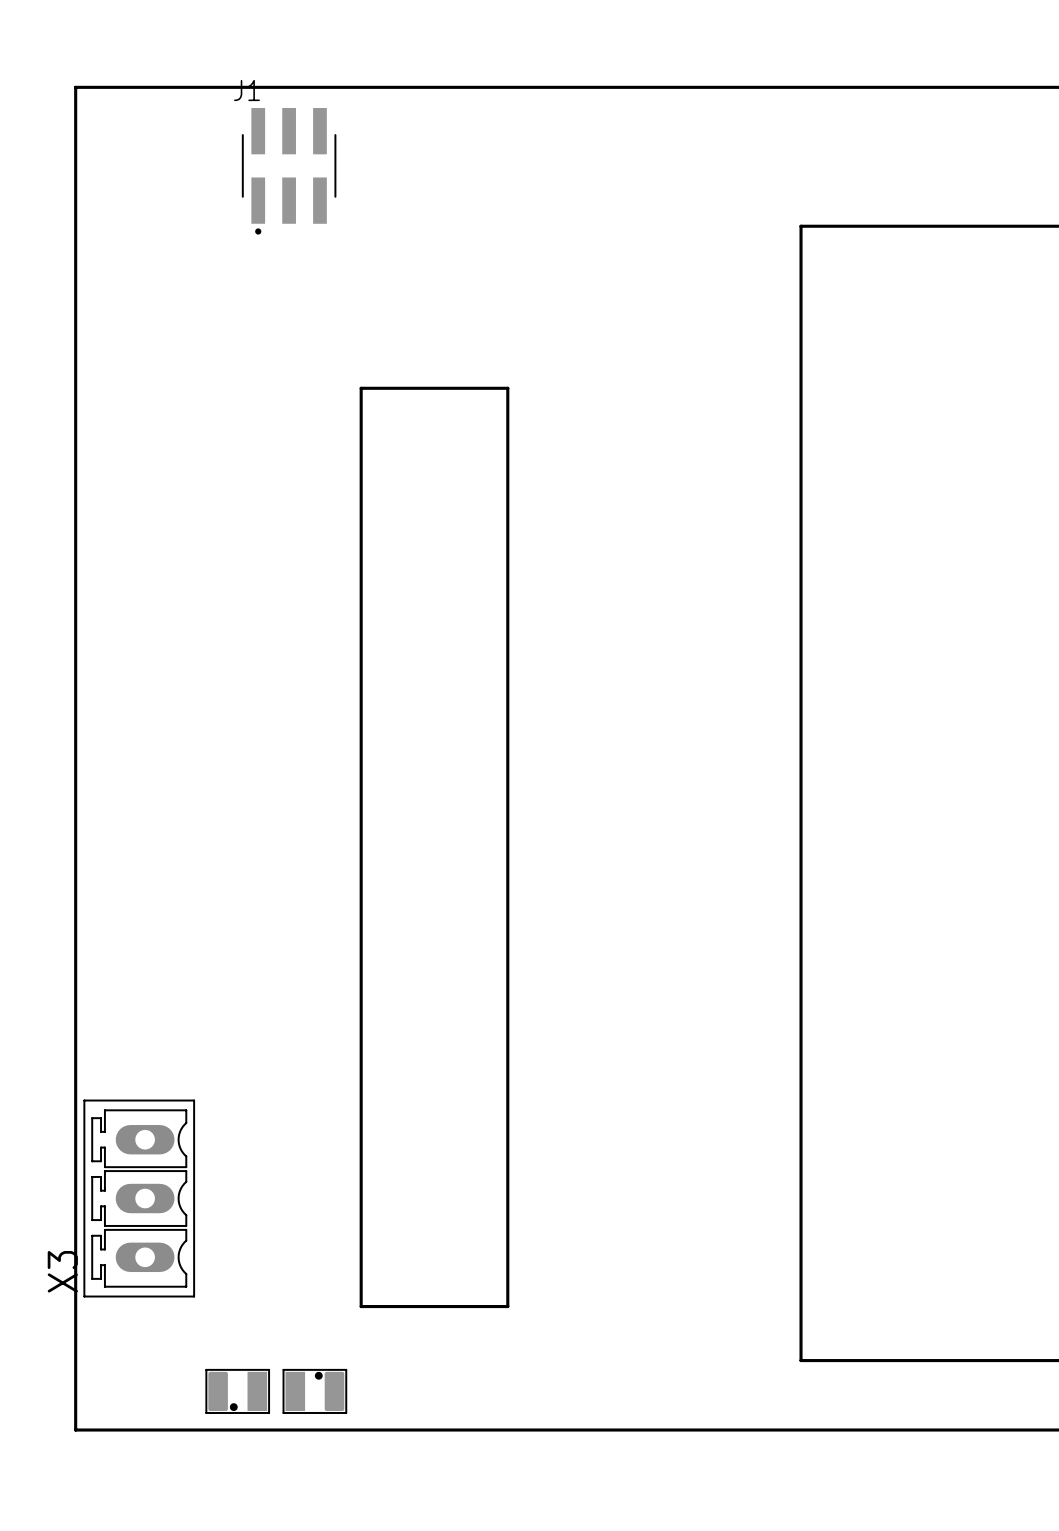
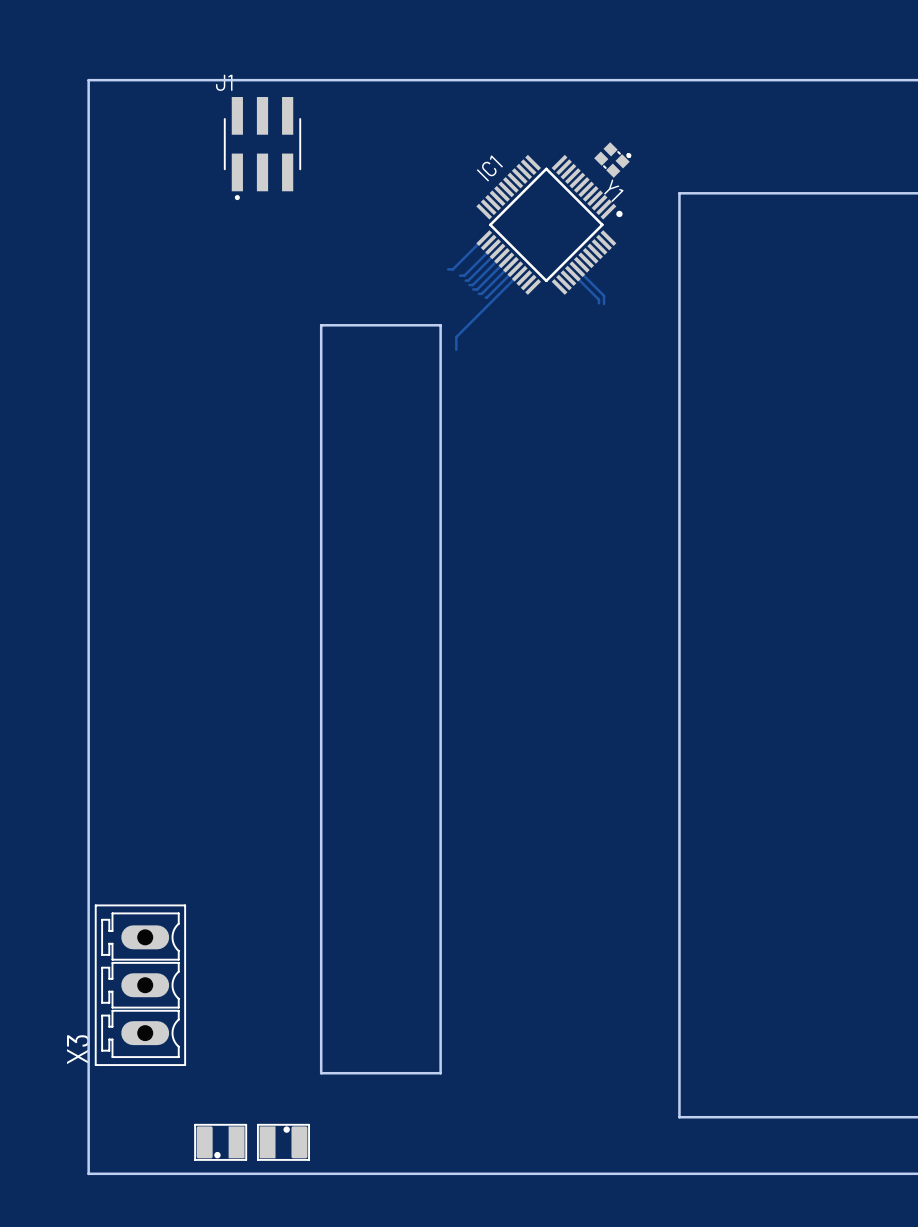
Y1: none -> (612, 159)
IC1: none -> (549, 224)
track: none -> (484, 238) (452, 269) (448, 269)
track: none -> (493, 246) (464, 275) (460, 275)
track: none -> (497, 251) (468, 280) (465, 280)
track: none -> (502, 255) (472, 285) (469, 285)
track: none -> (506, 260) (477, 289) (473, 289)
track: none -> (510, 264) (481, 293) (478, 293)
track: none -> (515, 269) (485, 297)
track: none -> (577, 269) (604, 295) (604, 303)
track: none -> (519, 273) (456, 337) (456, 349)
track: none -> (572, 273) (599, 299) (599, 303)

